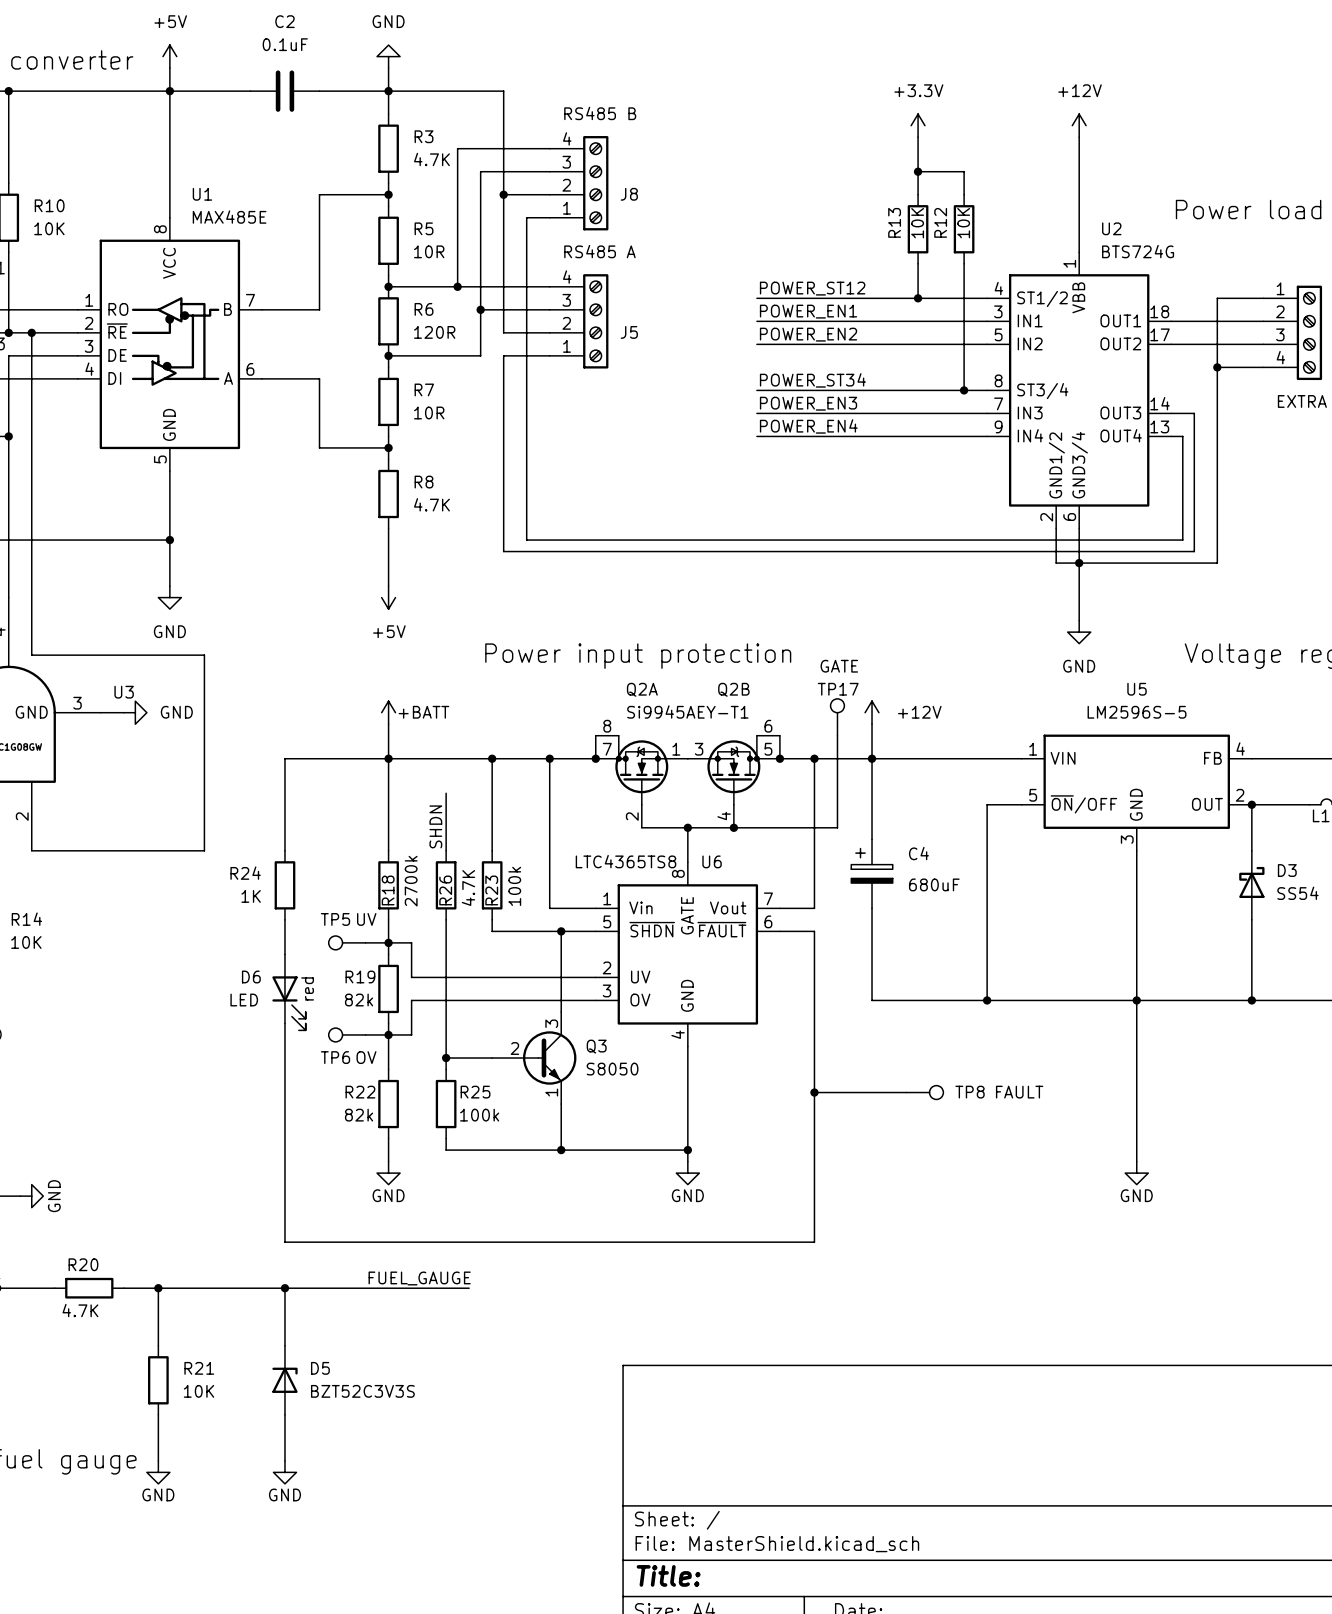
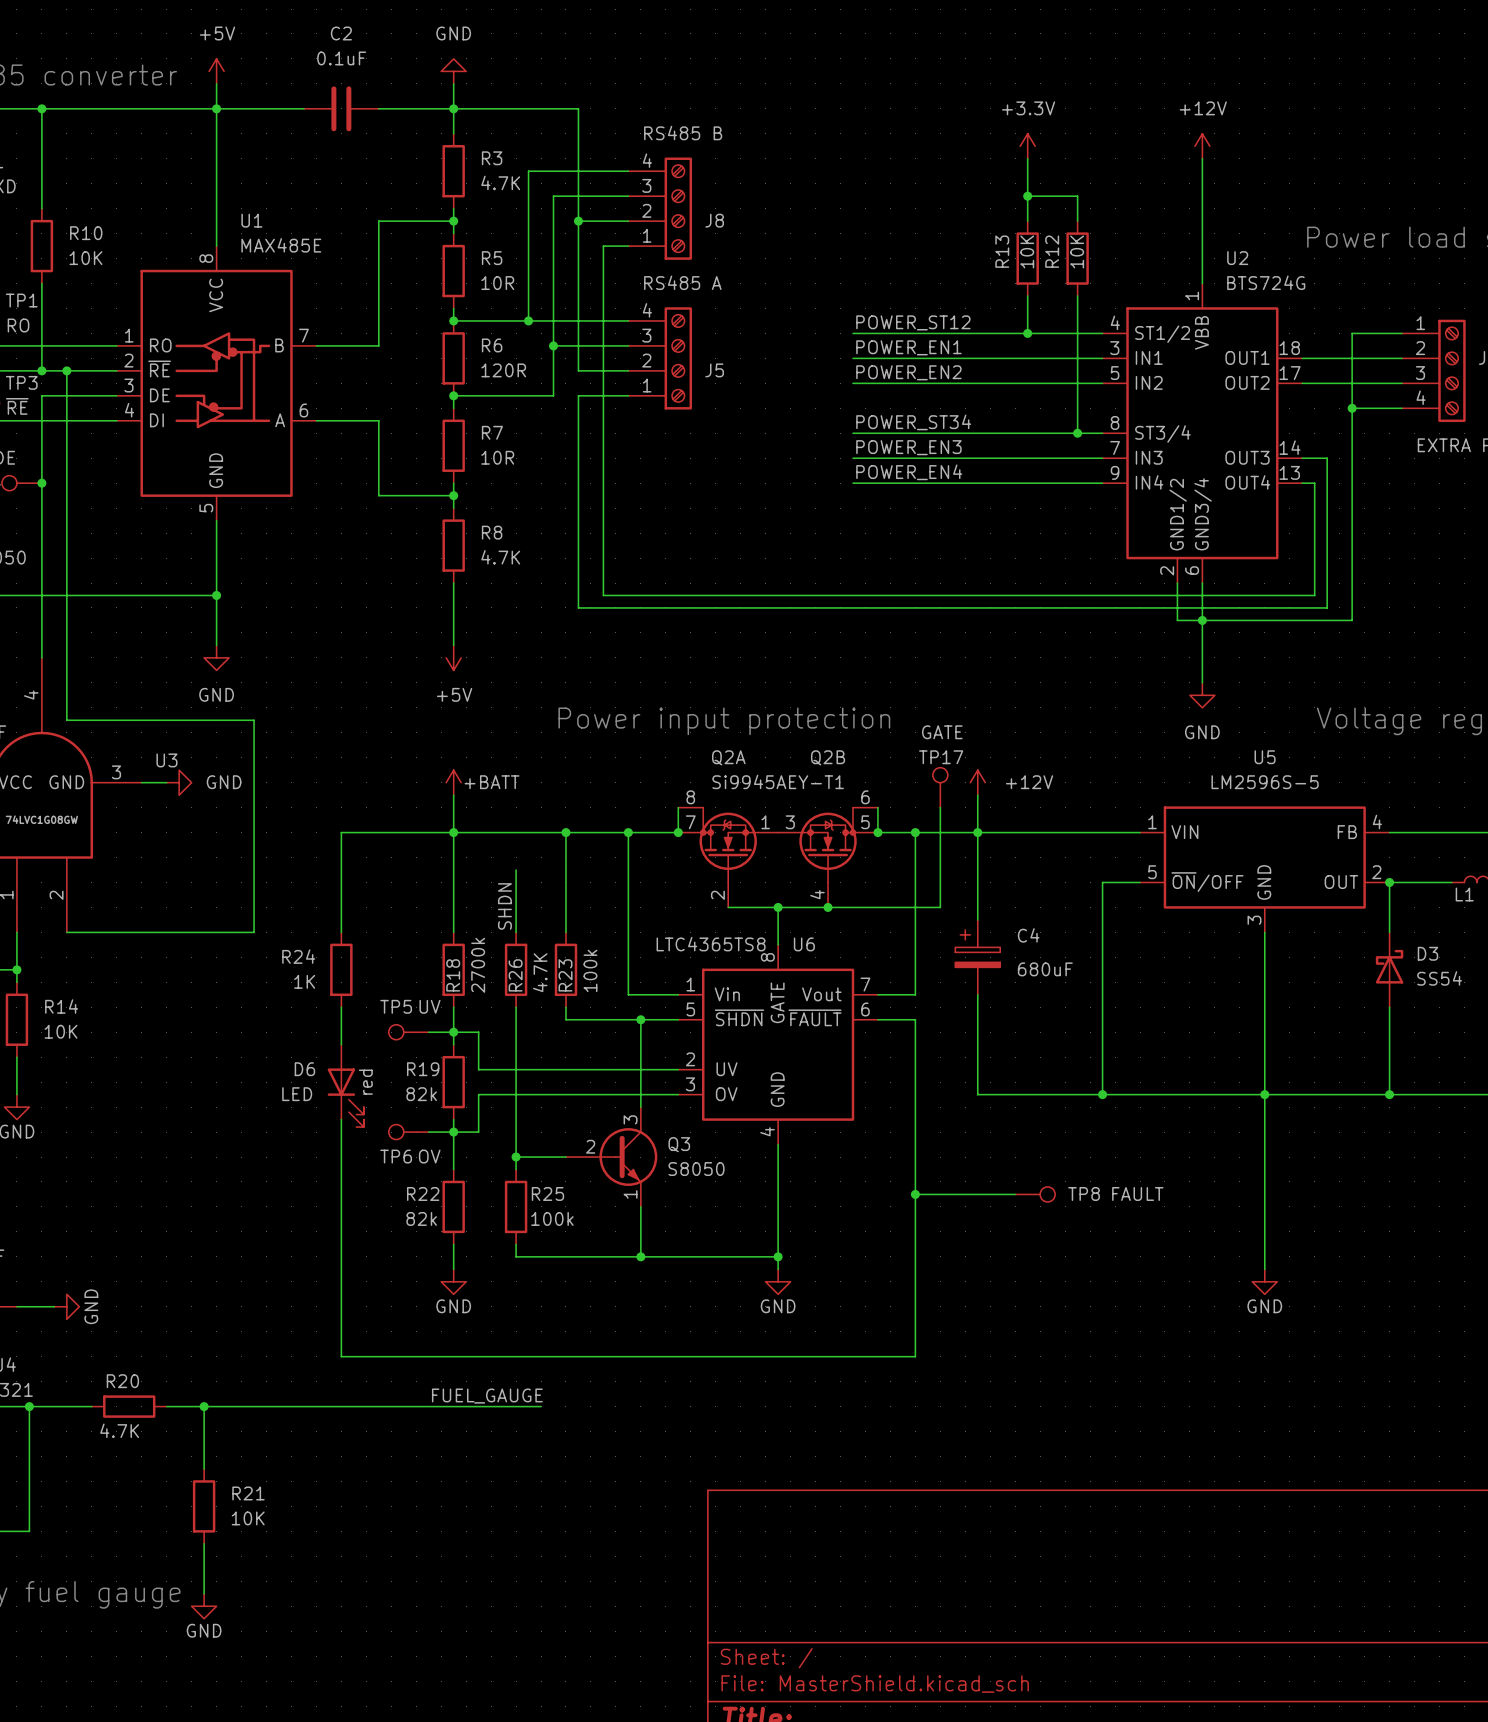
wire: (284, 1288) (284, 1345) -> none
junction: (284, 1288) -> none
D5: BZT52C3V3S (284, 1380) -> none
wire: (284, 1414) (284, 1460) -> none
power symbol: GND (284, 1472) -> none

